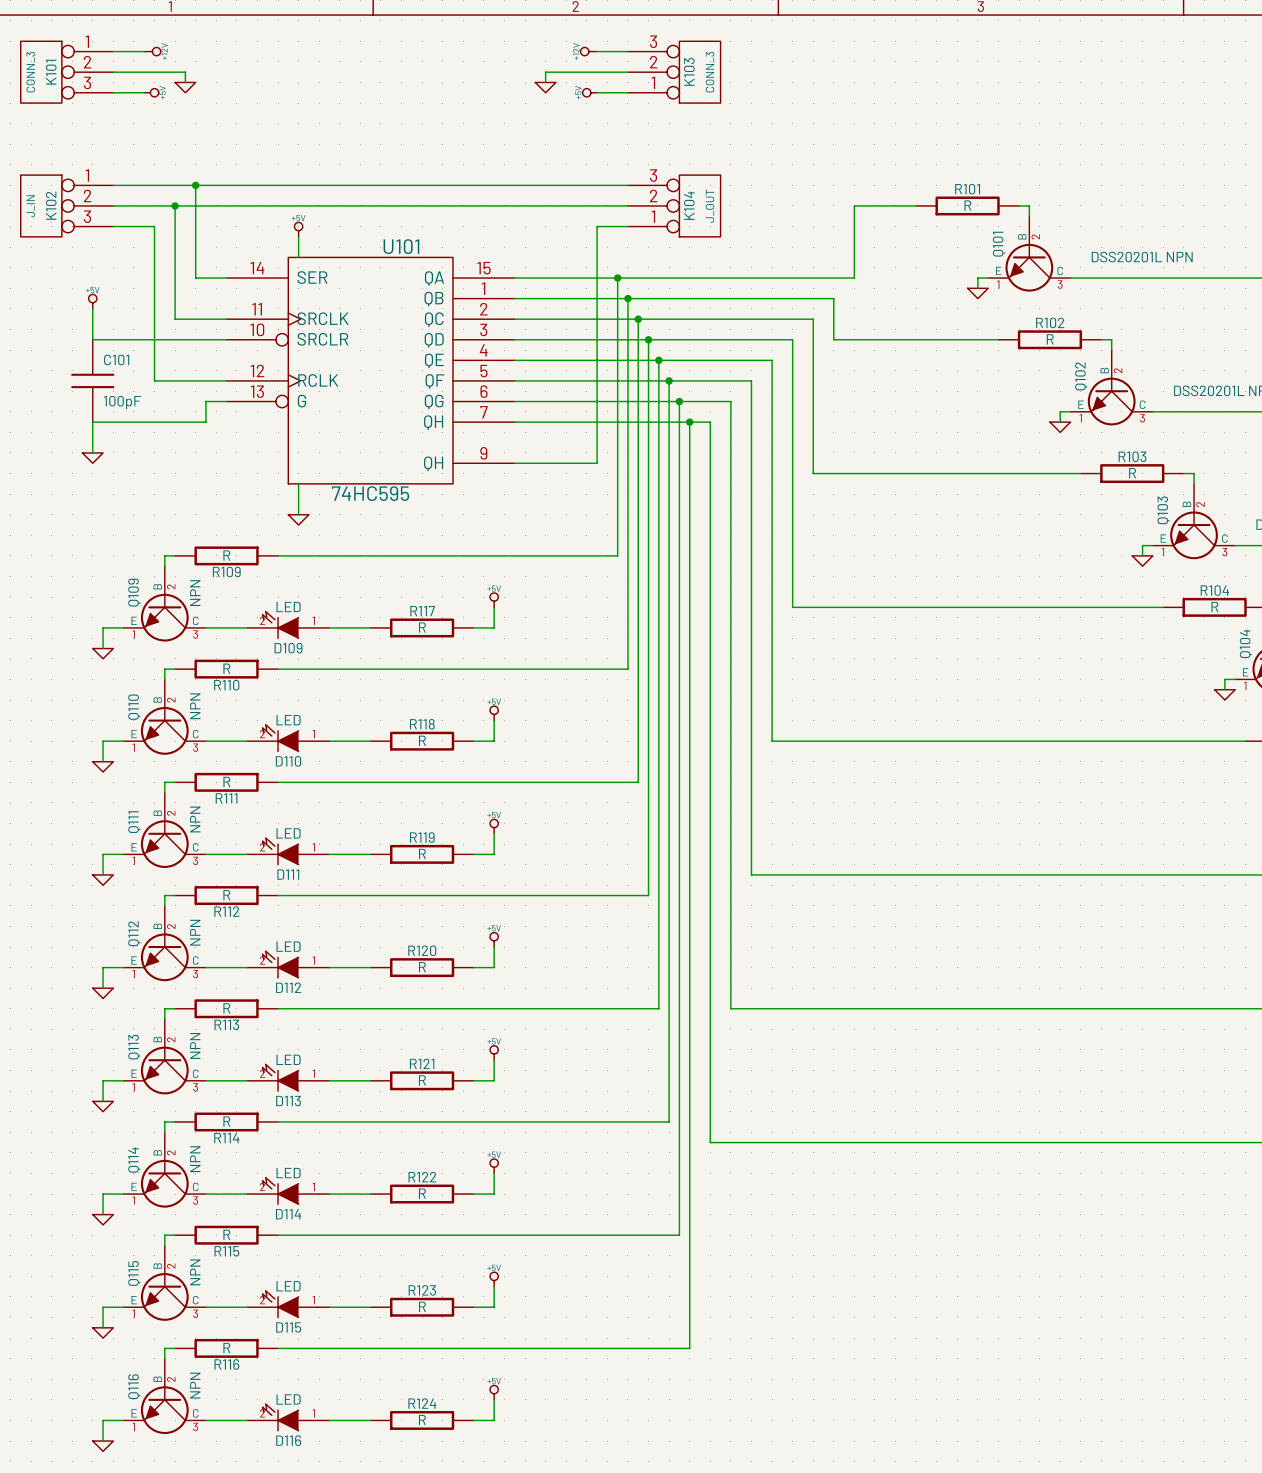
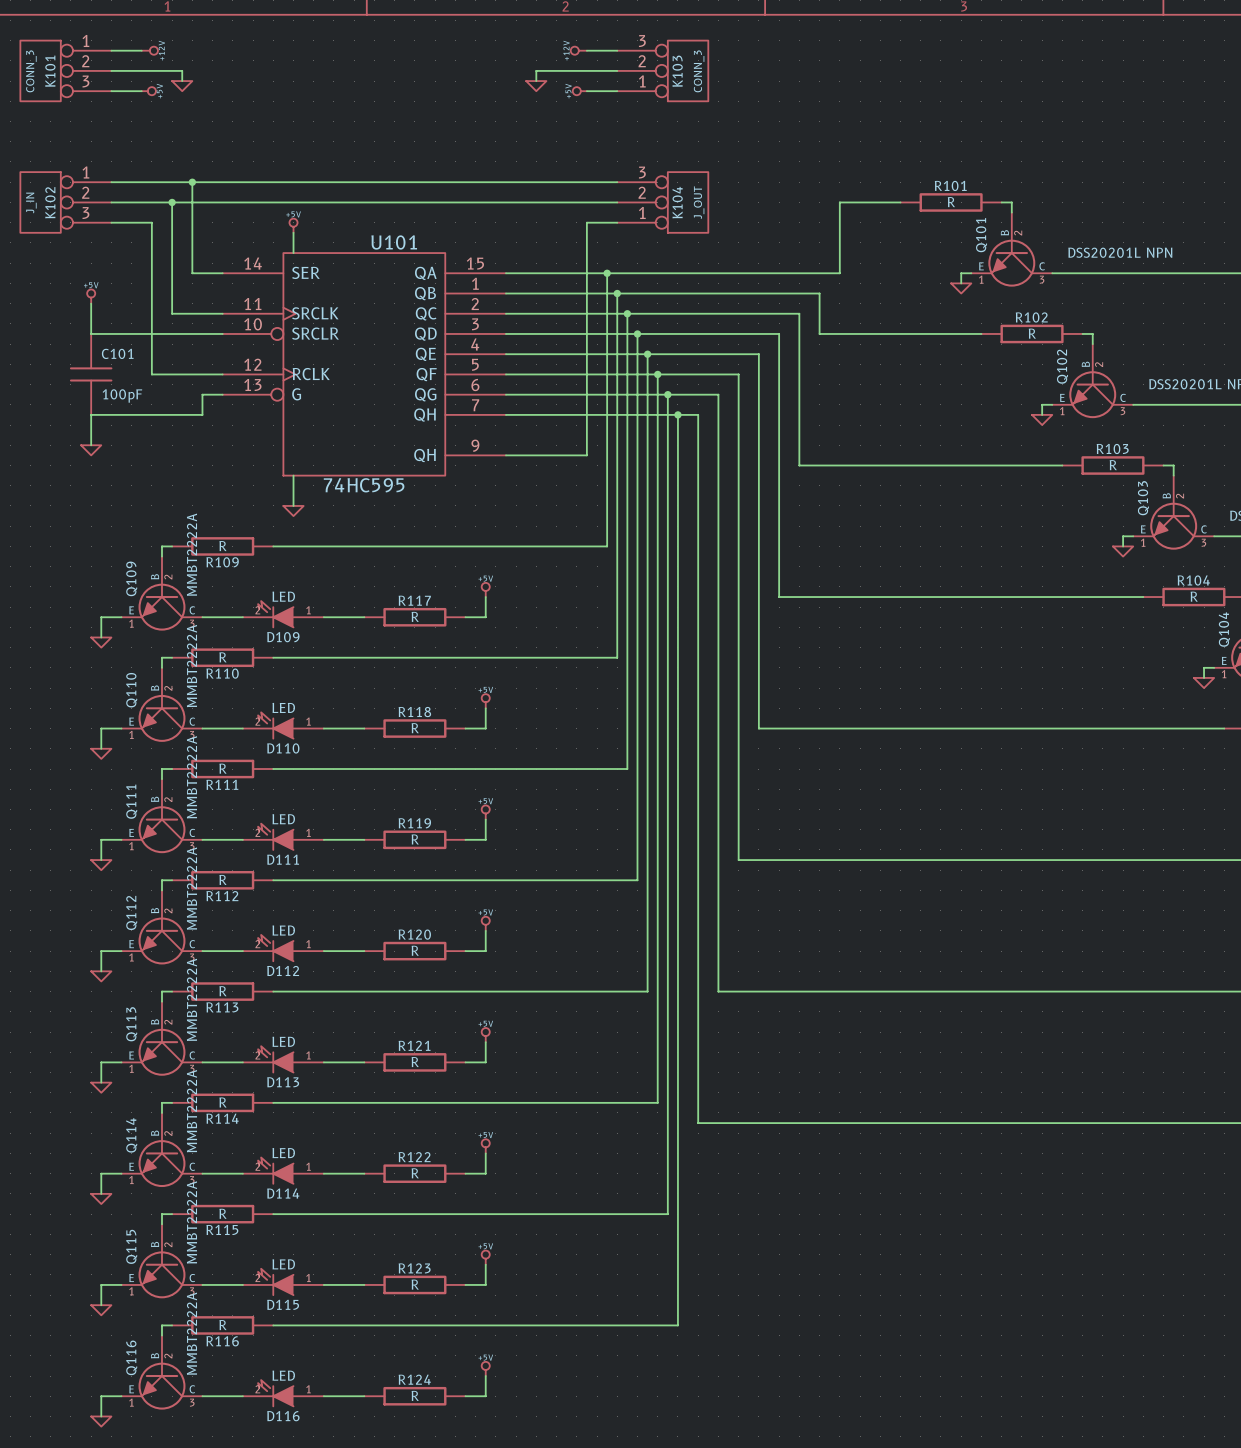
Q109 value: NPN (195, 593) -> MMBT2222A (191, 554)
Q110 value: NPN (195, 706) -> MMBT2222A (191, 666)
Q111 value: NPN (195, 819) -> MMBT2222A (191, 777)
Q112 value: NPN (195, 932) -> MMBT2222A (191, 888)
Q113 value: NPN (195, 1045) -> MMBT2222A (191, 999)
Q114 value: NPN (195, 1159) -> MMBT2222A (191, 1111)
Q115 value: NPN (195, 1272) -> MMBT2222A (191, 1222)
Q116 value: NPN (195, 1385) -> MMBT2222A (191, 1333)

